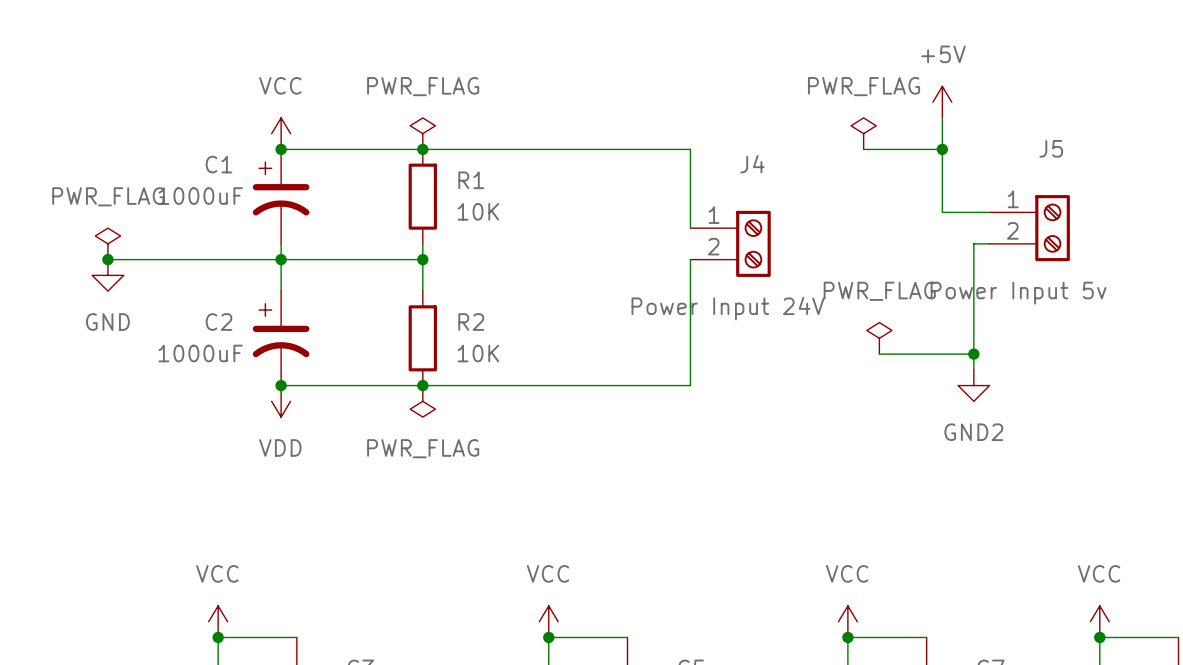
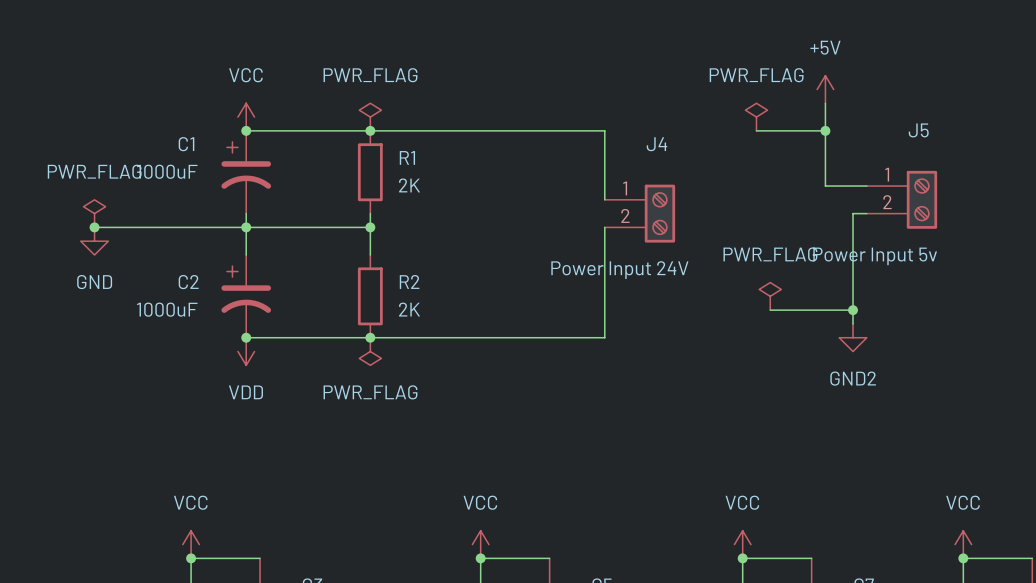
R1 value: 10K (478, 211) -> 2K (409, 185)
R2 value: 10K (478, 353) -> 2K (409, 309)

